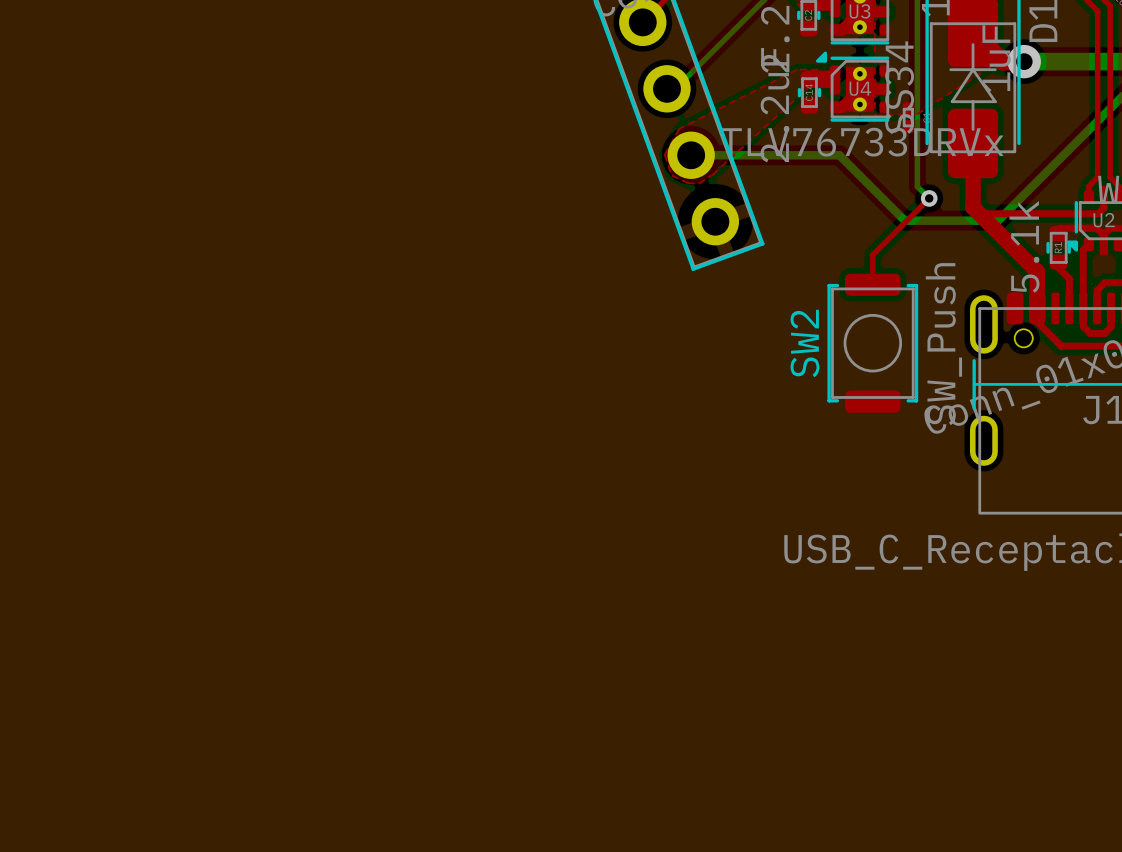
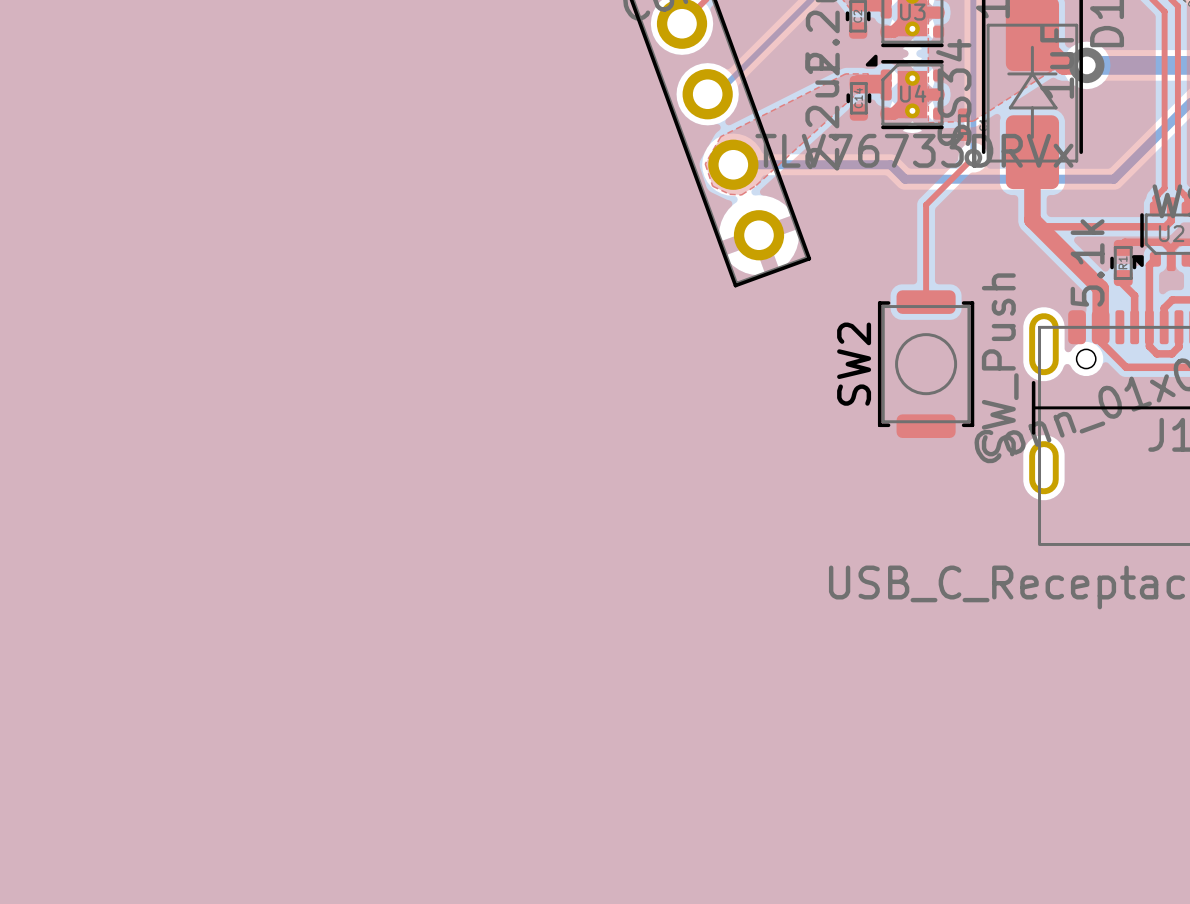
bottom track: (917, 148) (917, 186) (929, 198) -> none
bottom track: (853, 168) (904, 220) (998, 220) (1049, 168) -> (905, 179) (1113, 179)
top track: (929, 198) (872, 254) -> (973, 157) (926, 204) (926, 270)
via position: (929, 198) -> (973, 157)

